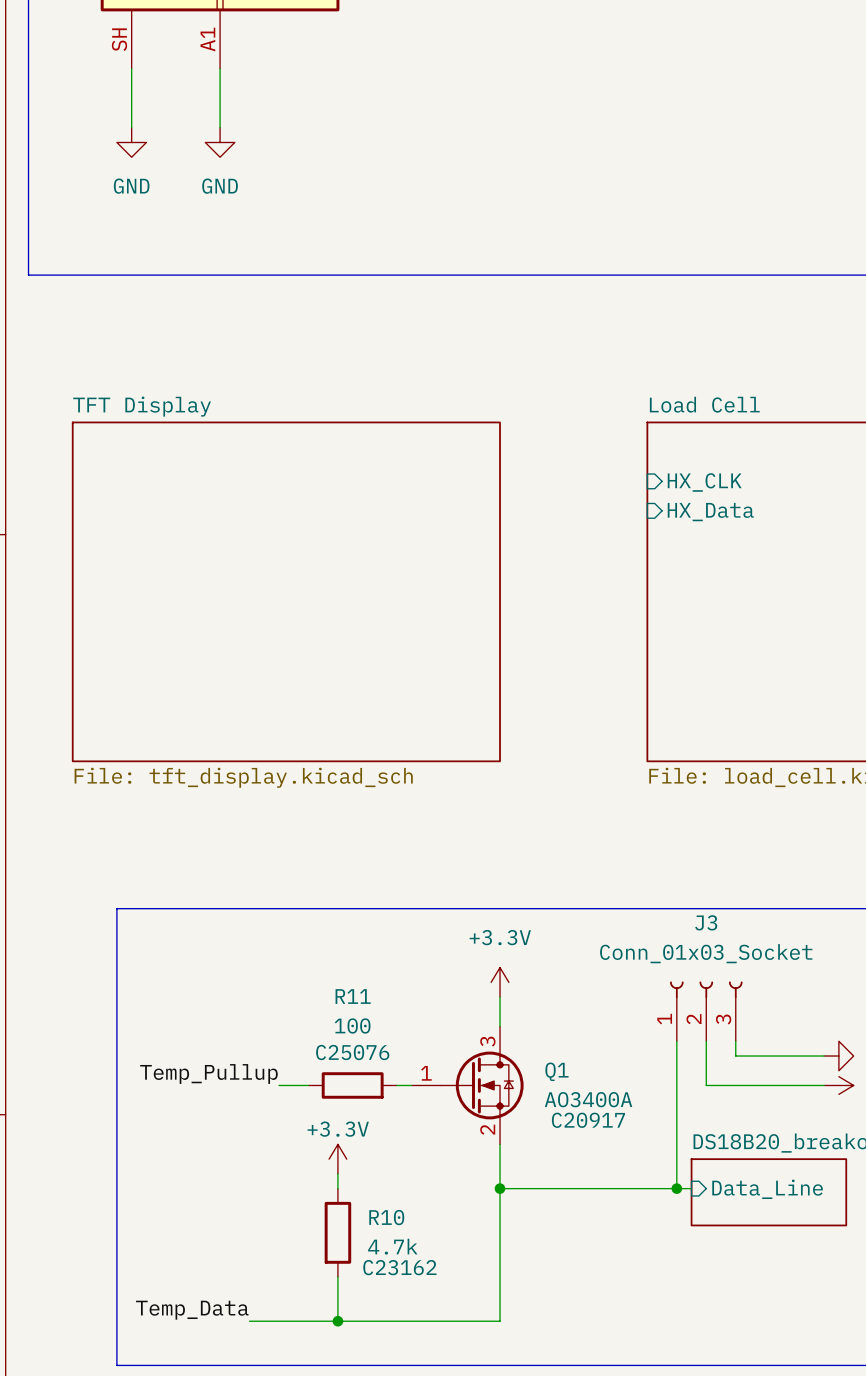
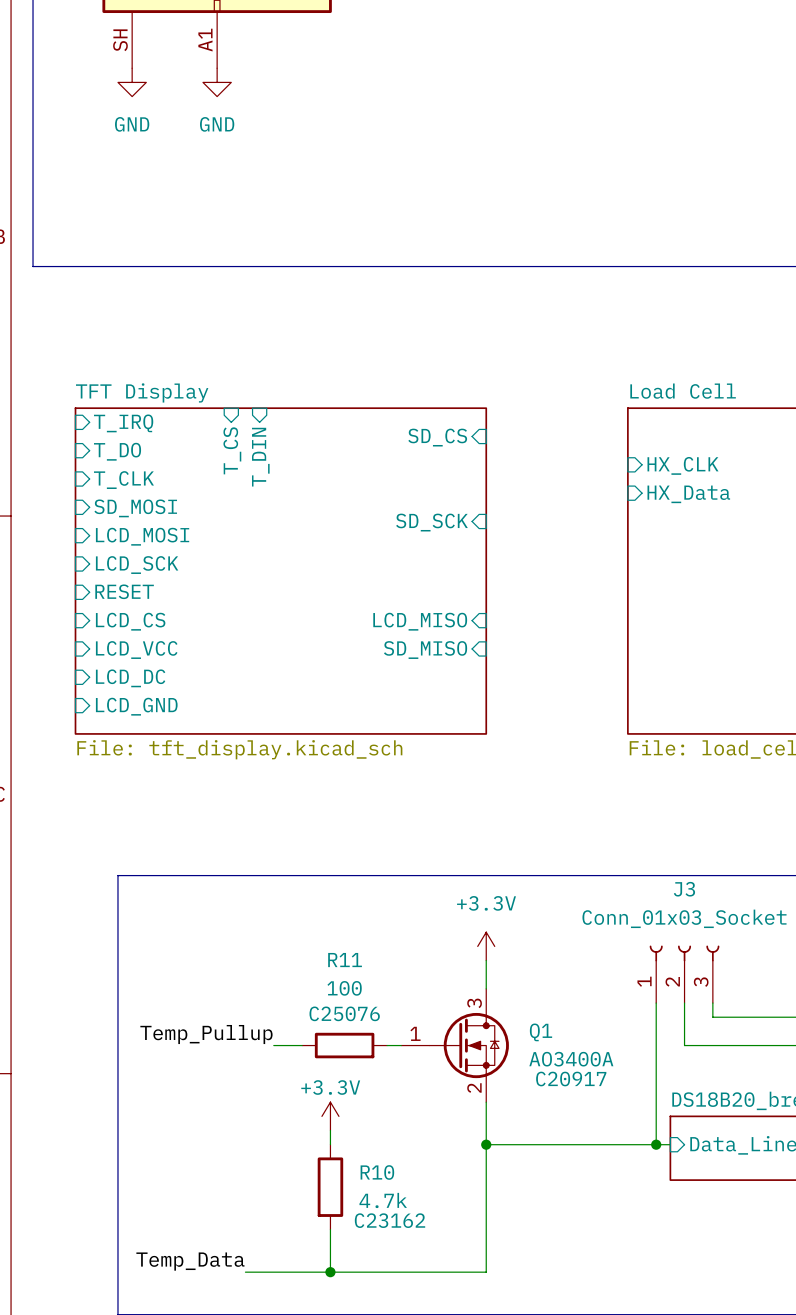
wire: (131, 68) (131, 127) -> none
wire: (220, 68) (220, 127) -> none
power symbol: none -> GND (132, 82)
power symbol: none -> GND (217, 82)
power symbol: GND (131, 142) -> none
power symbol: GND (220, 142) -> none
sheet pin: none -> T_IRQ (123, 423)
sheet pin: none -> SD_CS (437, 437)
sheet pin: none -> T_CS (232, 450)
sheet pin: none -> T_DO (117, 451)
sheet pin: none -> T_DIN (260, 457)
sheet pin: none -> T_CLK (123, 480)
sheet pin: none -> SD_MOSI (135, 508)
sheet pin: none -> SD_SCK (431, 522)
sheet pin: none -> LCD_MOSI (142, 536)
sheet pin: none -> LCD_SCK (137, 565)
sheet pin: none -> RESET (124, 591)
sheet pin: none -> LCD_CS (130, 621)
sheet pin: none -> LCD_MISO (420, 621)
sheet pin: none -> LCD_VCC (136, 650)
sheet pin: none -> SD_MISO (425, 650)
sheet pin: none -> LCD_DC (130, 678)
sheet pin: none -> LCD_GND (136, 706)

